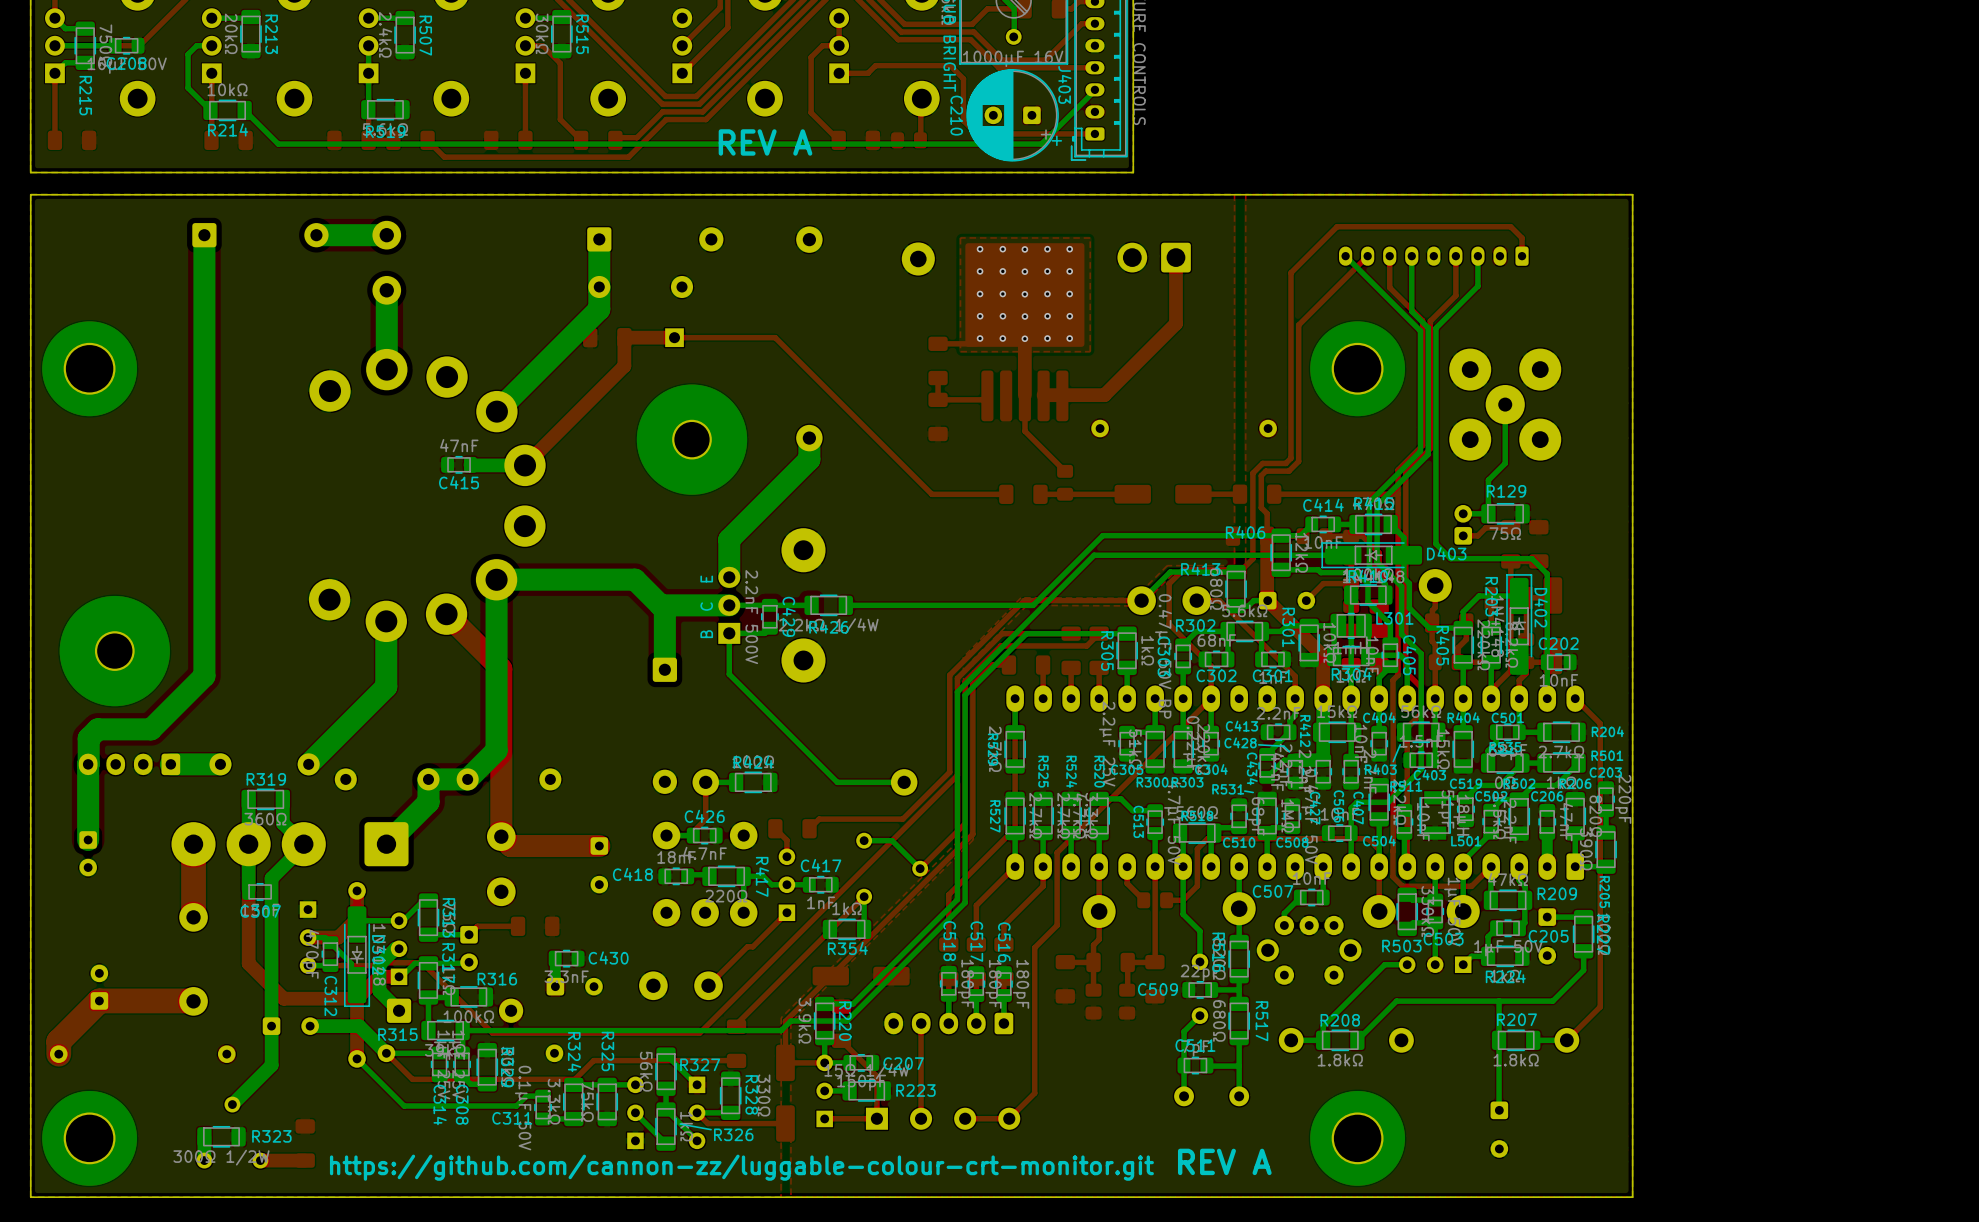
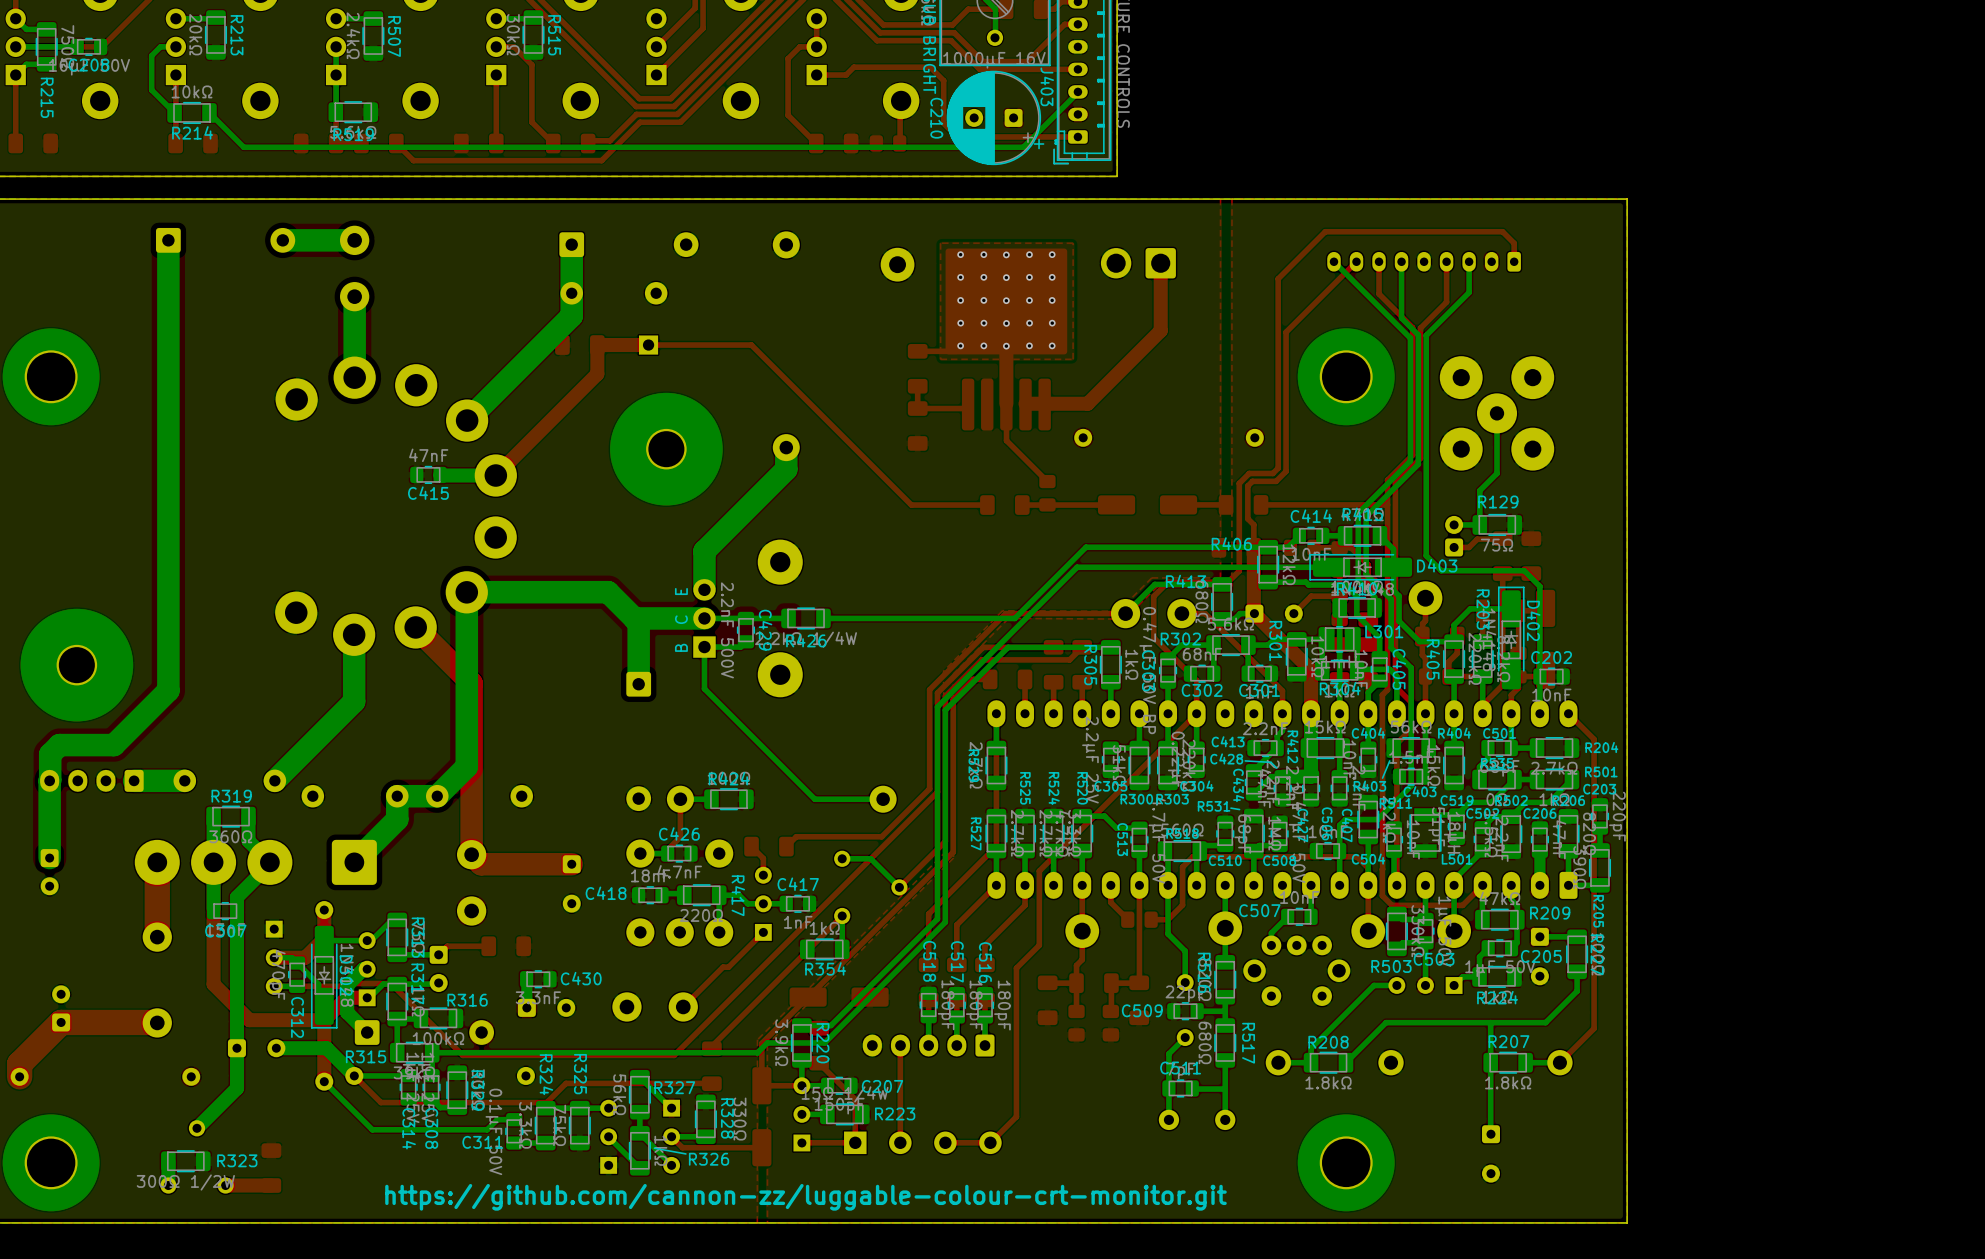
text: REV A (765, 142) -> none
text: REV A (1224, 1161) -> none
text position: https://github.com/cannon-zz/luggable-colour-crt-monitor.git (741, 1167) -> https://github.com/cannon-zz/luggable-colour-crt-monitor.git (805, 1197)

